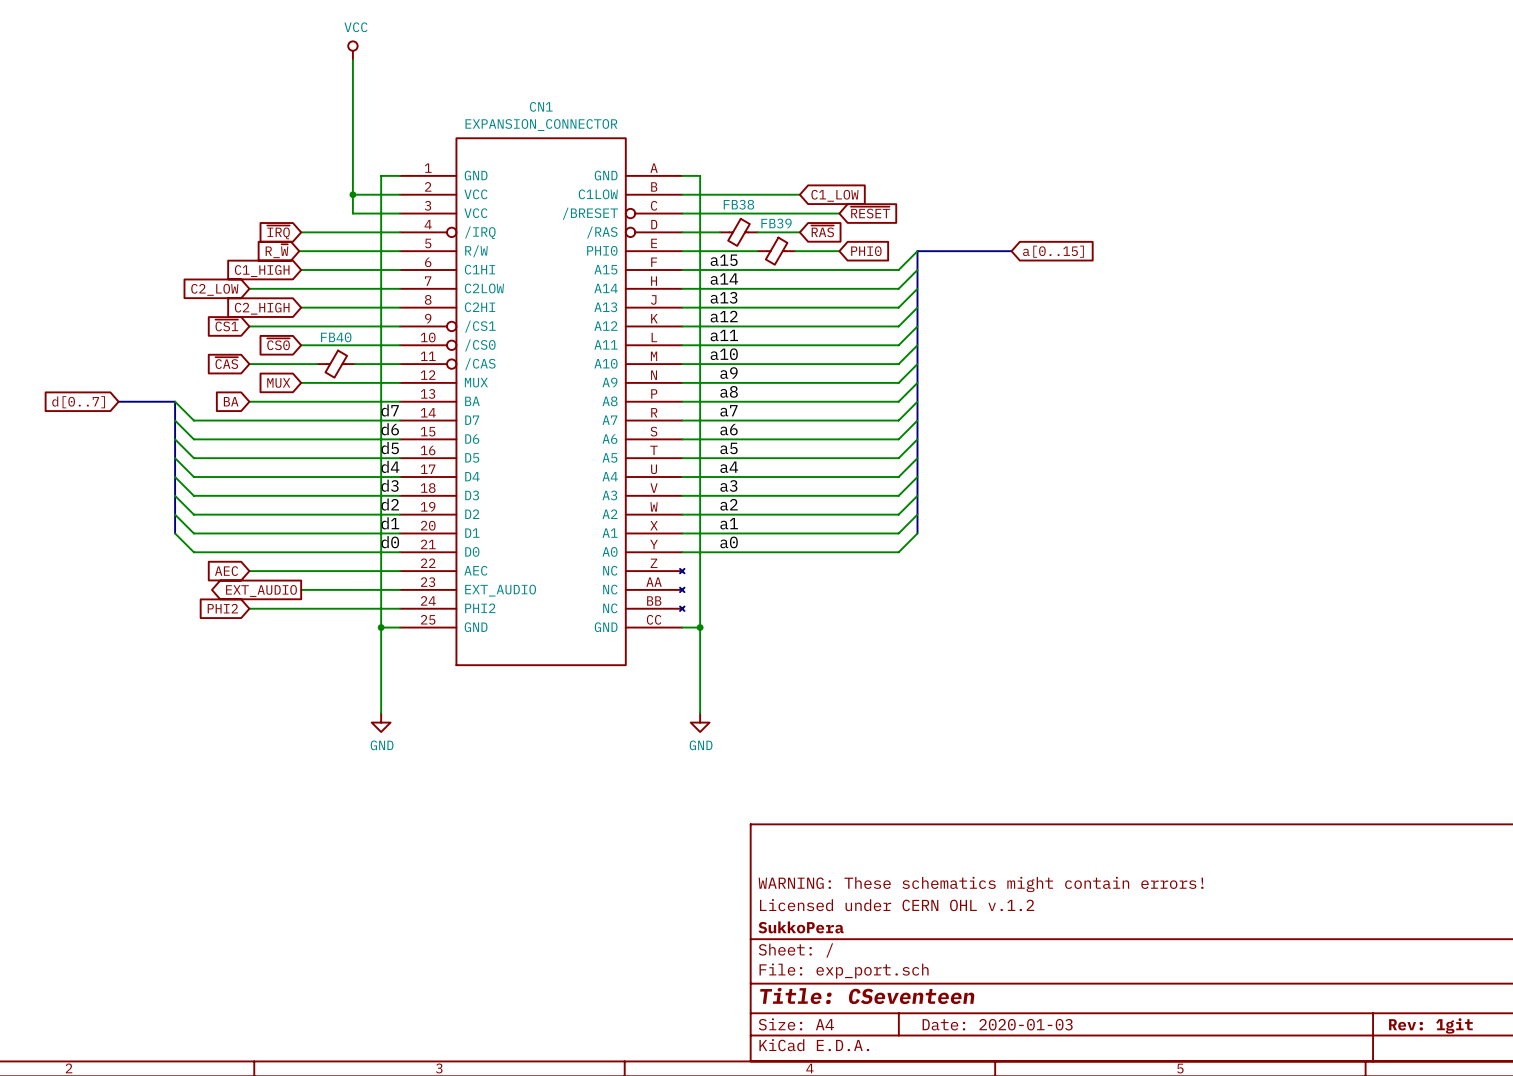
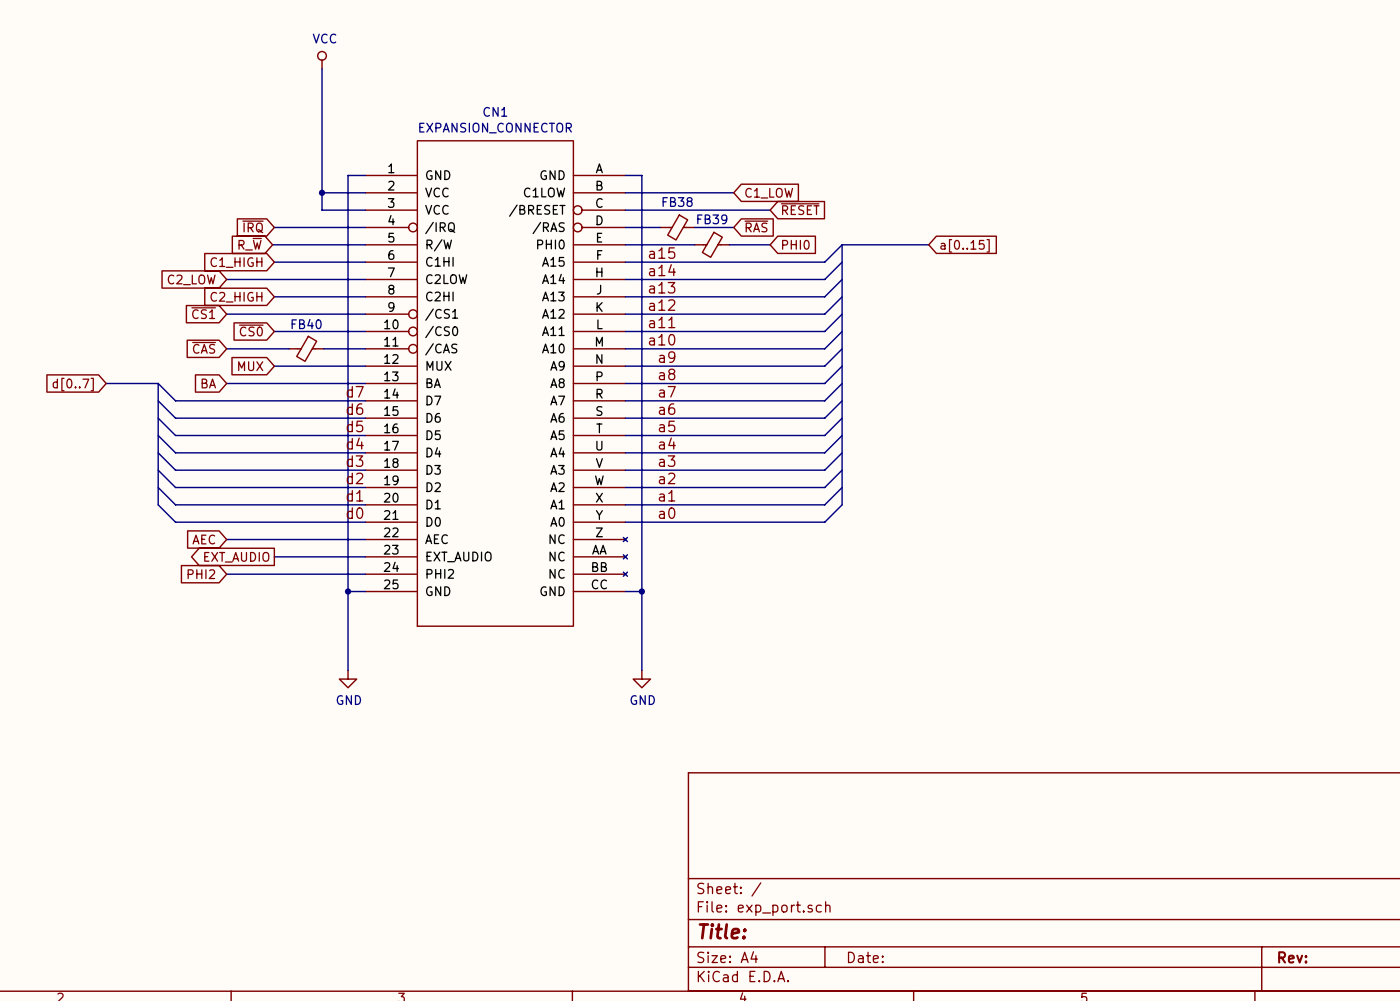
title block: WARNING: These schematics might contain errors! (981, 884) -> none
title block: Licensed under CERN OHL v.1.2 (897, 905) -> none
title block: SukkoPera (801, 927) -> none
title block: Title: CSeventeen (867, 995) -> Title: (722, 931)
title block: Date: 2020-01-03 (997, 1024) -> Date: (865, 957)
title block: Rev: 1git (1430, 1025) -> Rev: (1292, 957)

